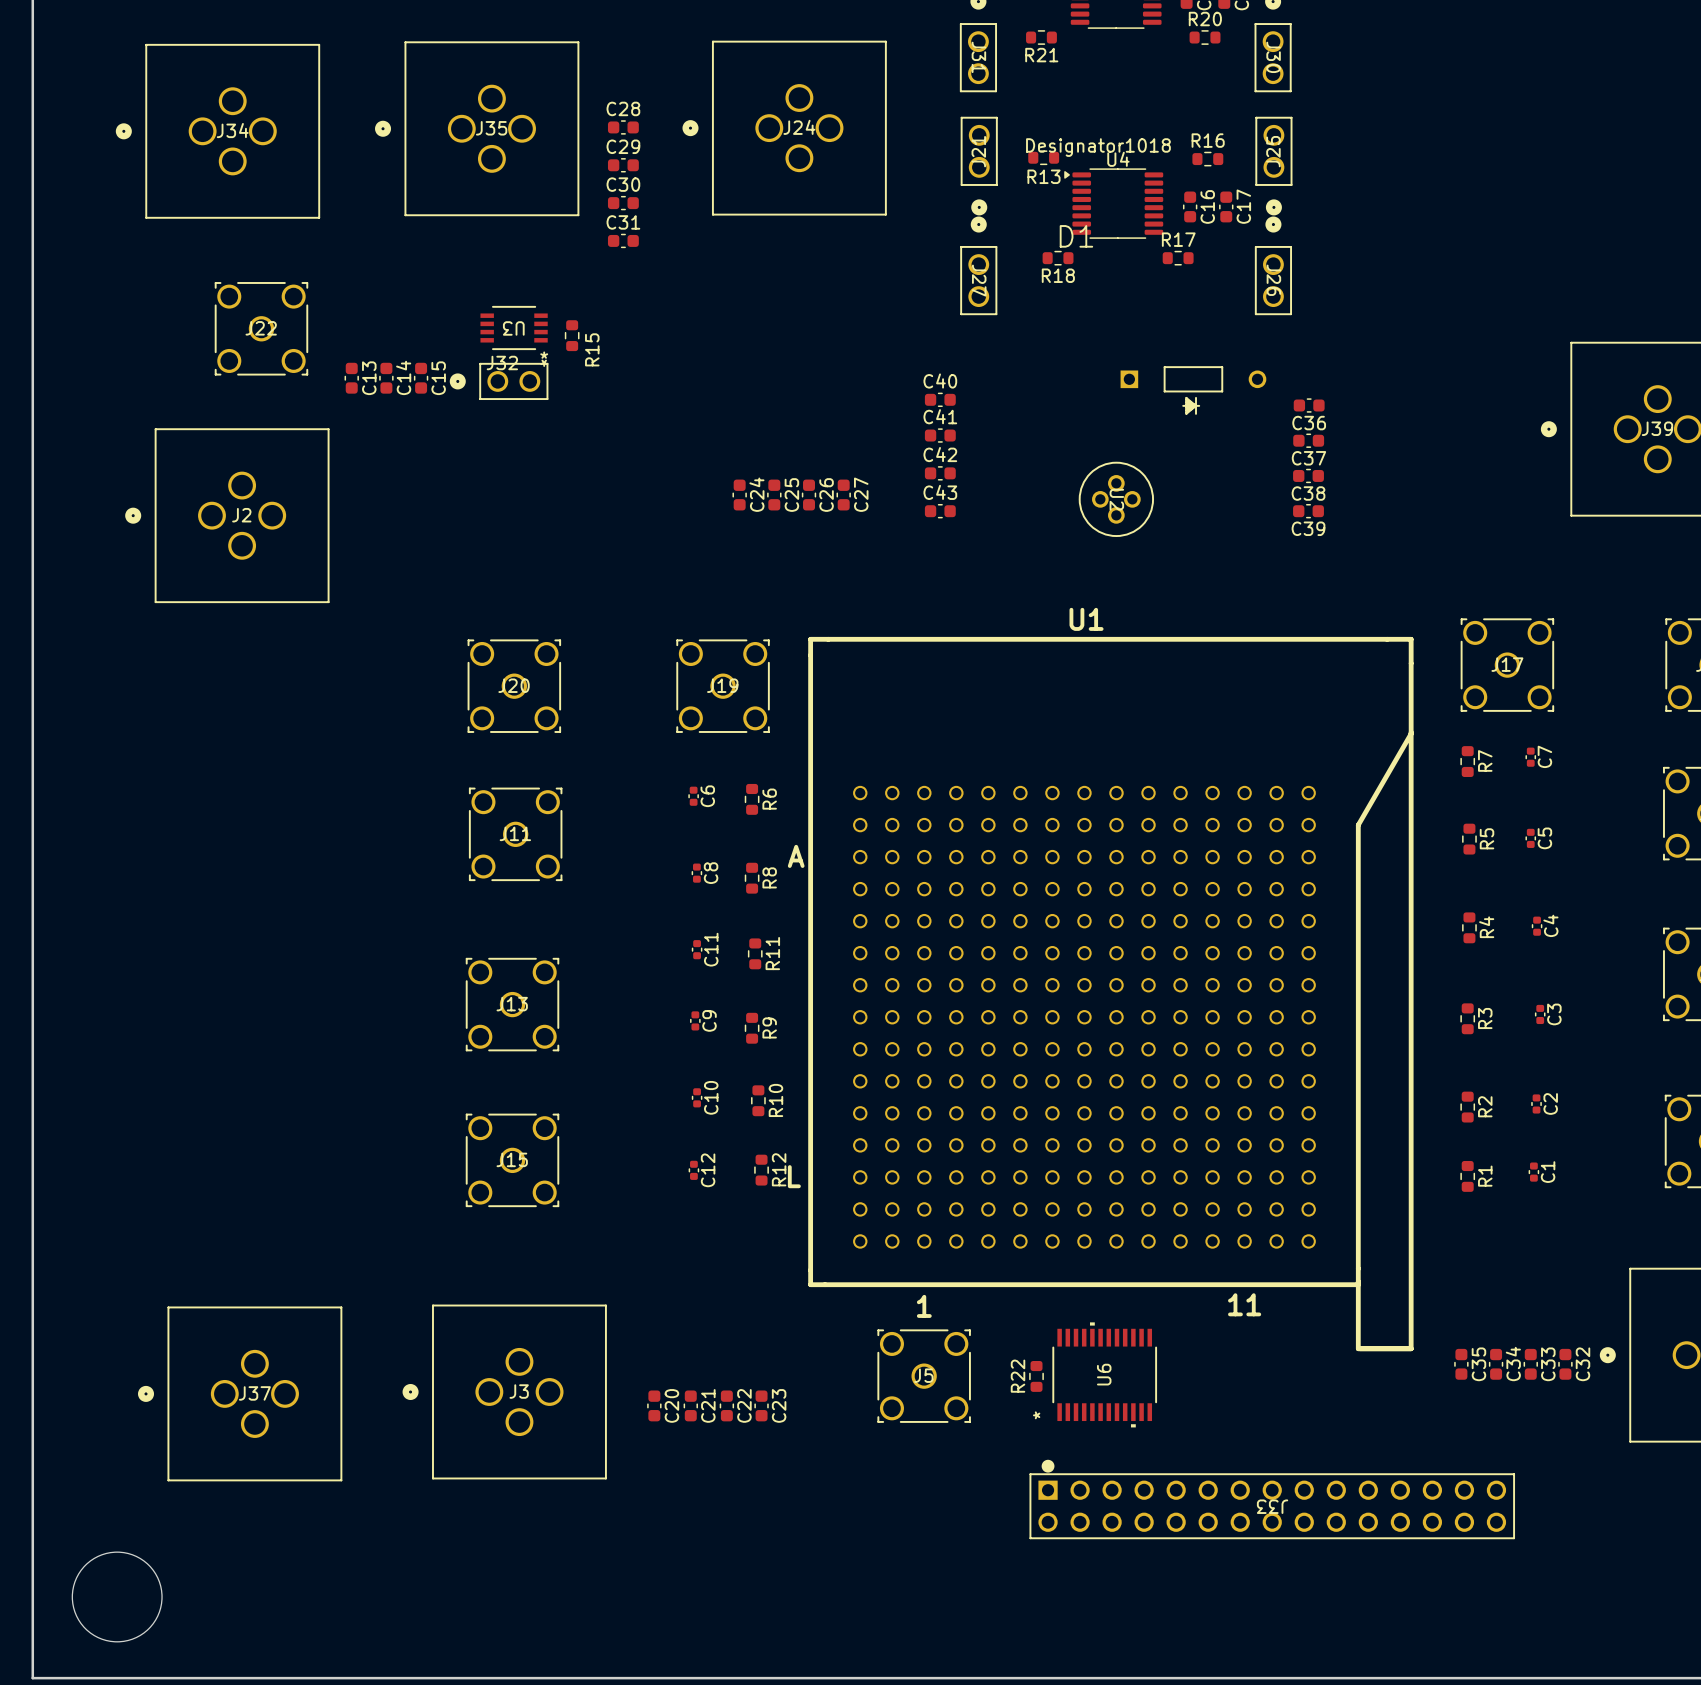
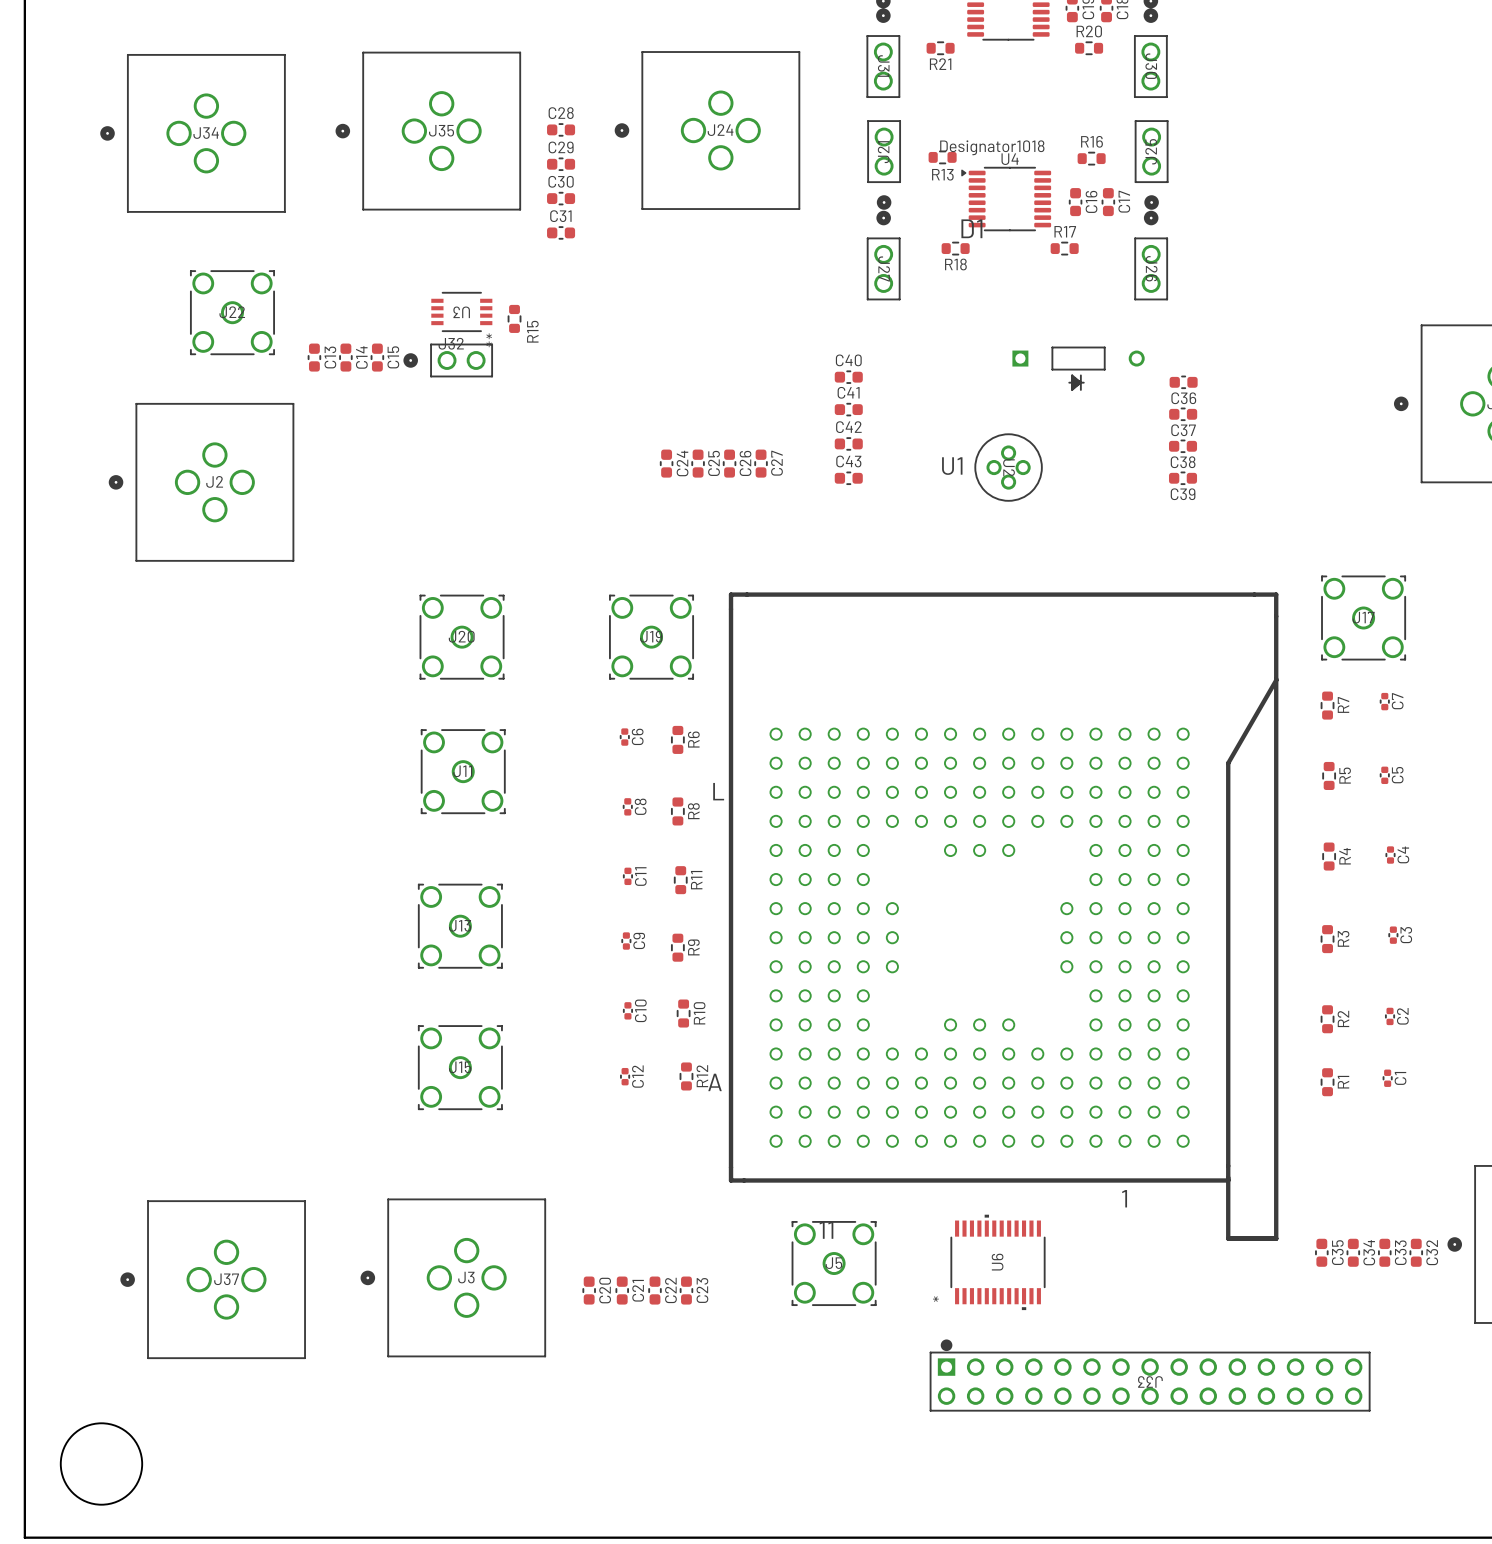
U1 name position: U1 (1086, 619) -> U1 (952, 466)
U1 footprint: [808, 636, 1414, 1352] -> [728, 592, 1279, 1241]
R22: (1036, 1376) -> none

